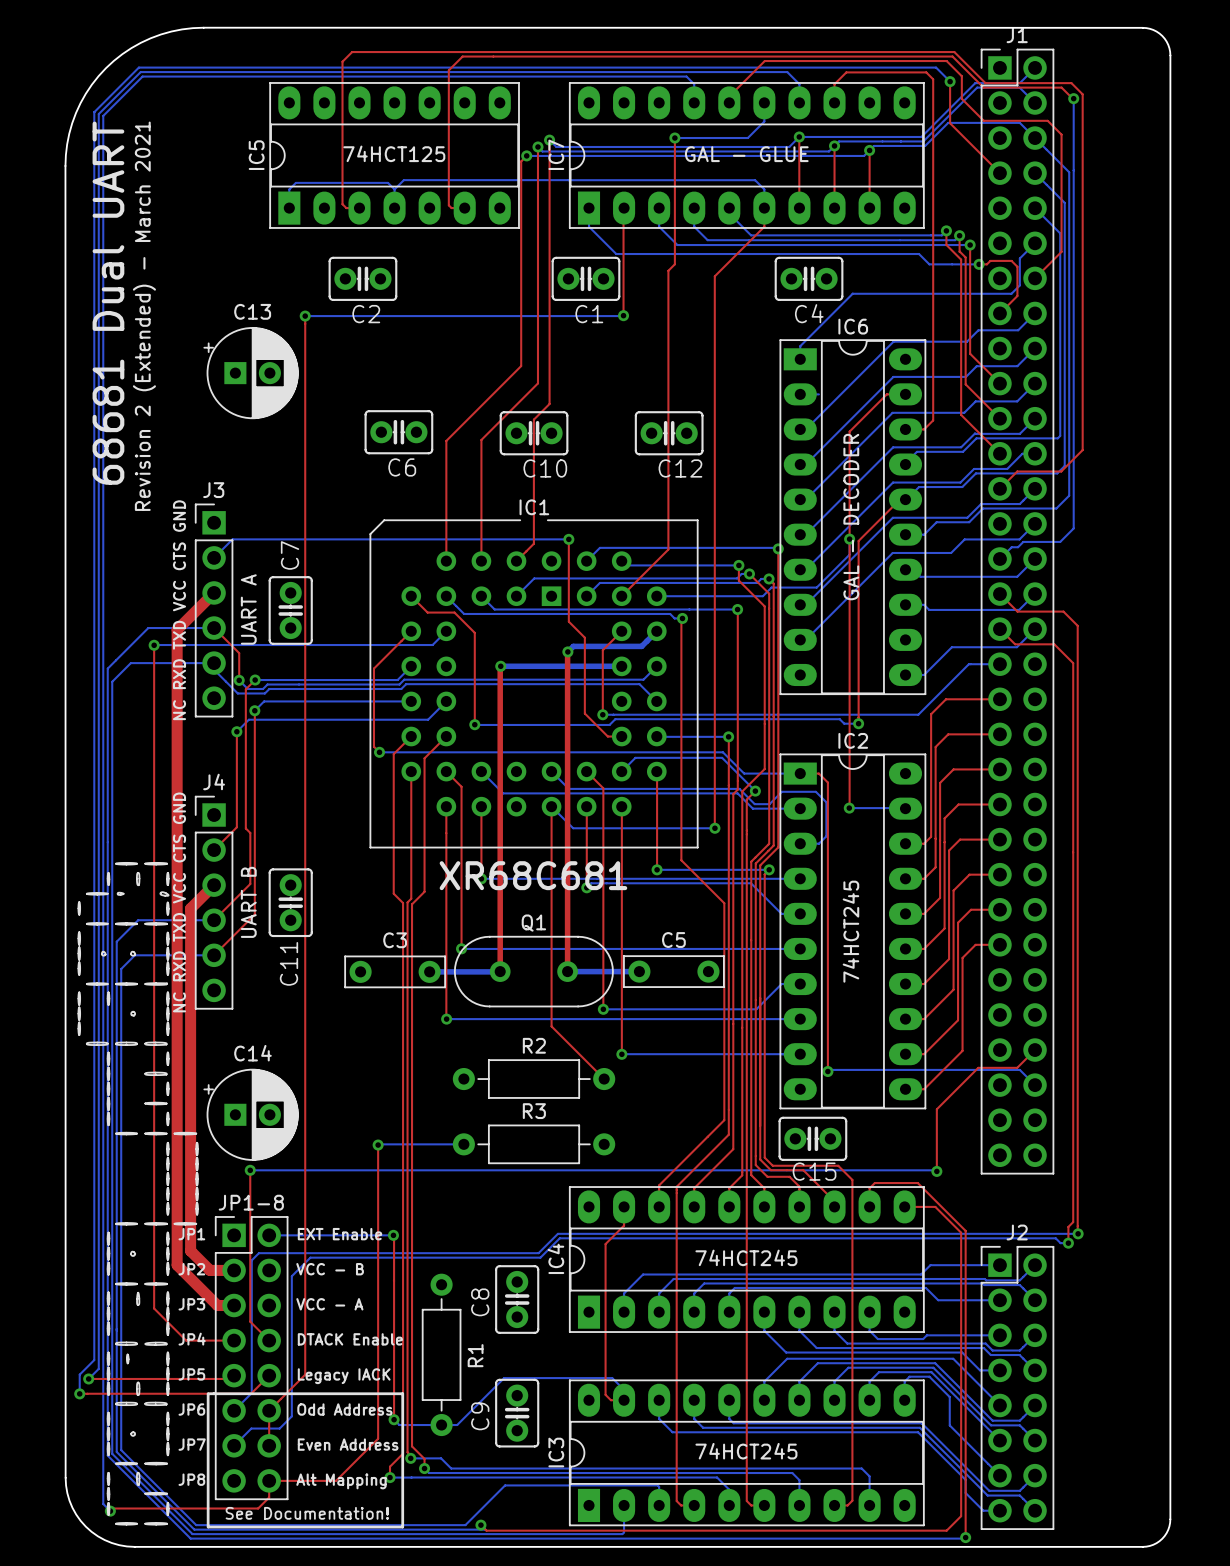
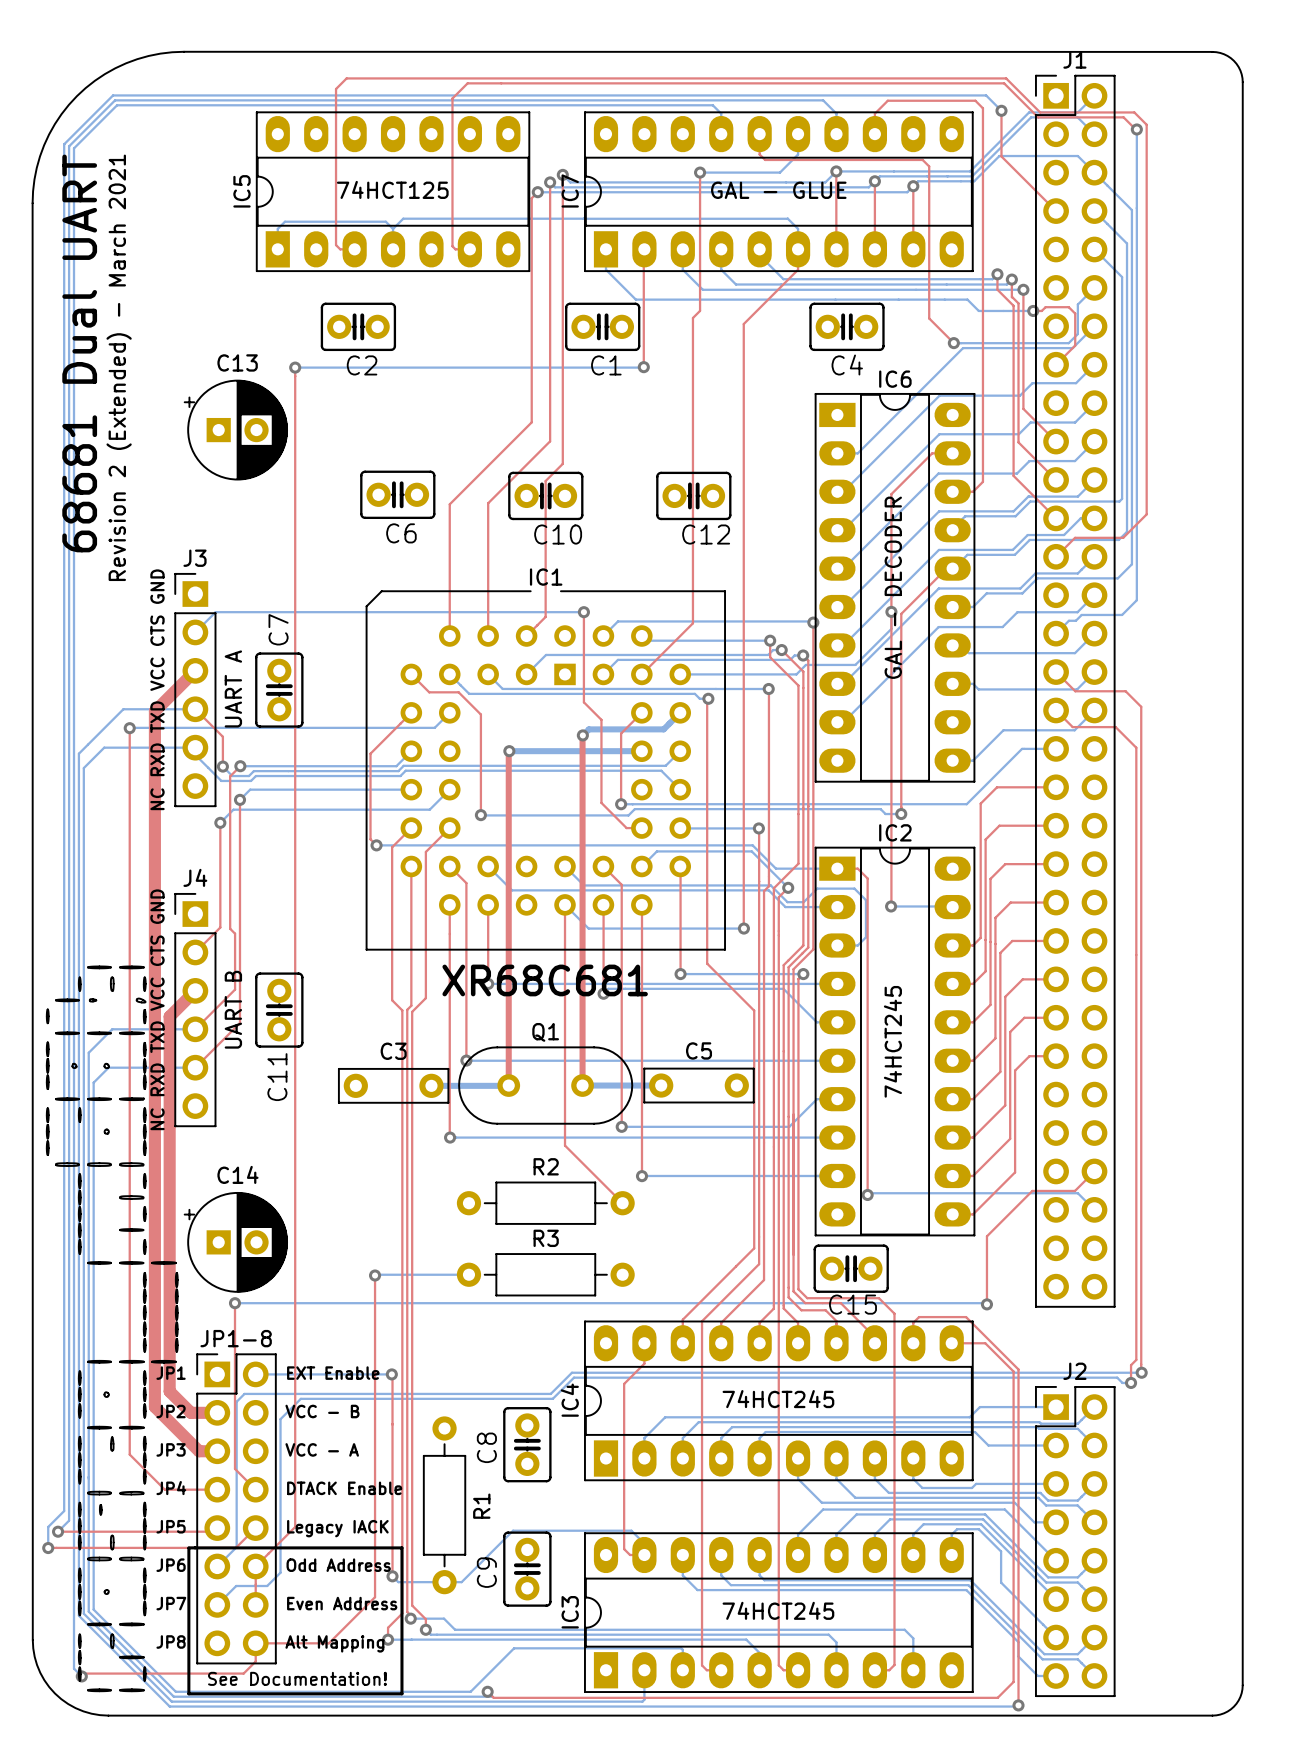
top track: (726, 99) (764, 61) (946, 61) (961, 76) (961, 98) (983, 120) (1047, 120) (1061, 134) (1061, 251) (1035, 278) -> none
top track: none -> (759, 134) (759, 154) (765, 159) (922, 159) (929, 166) (929, 318) (953, 343)
bottom track: none -> (1094, 326) (1072, 348) (963, 348) (857, 453)
bottom track: (906, 293) (852, 293) (800, 346) (800, 359) -> none
via: none -> (953, 343)

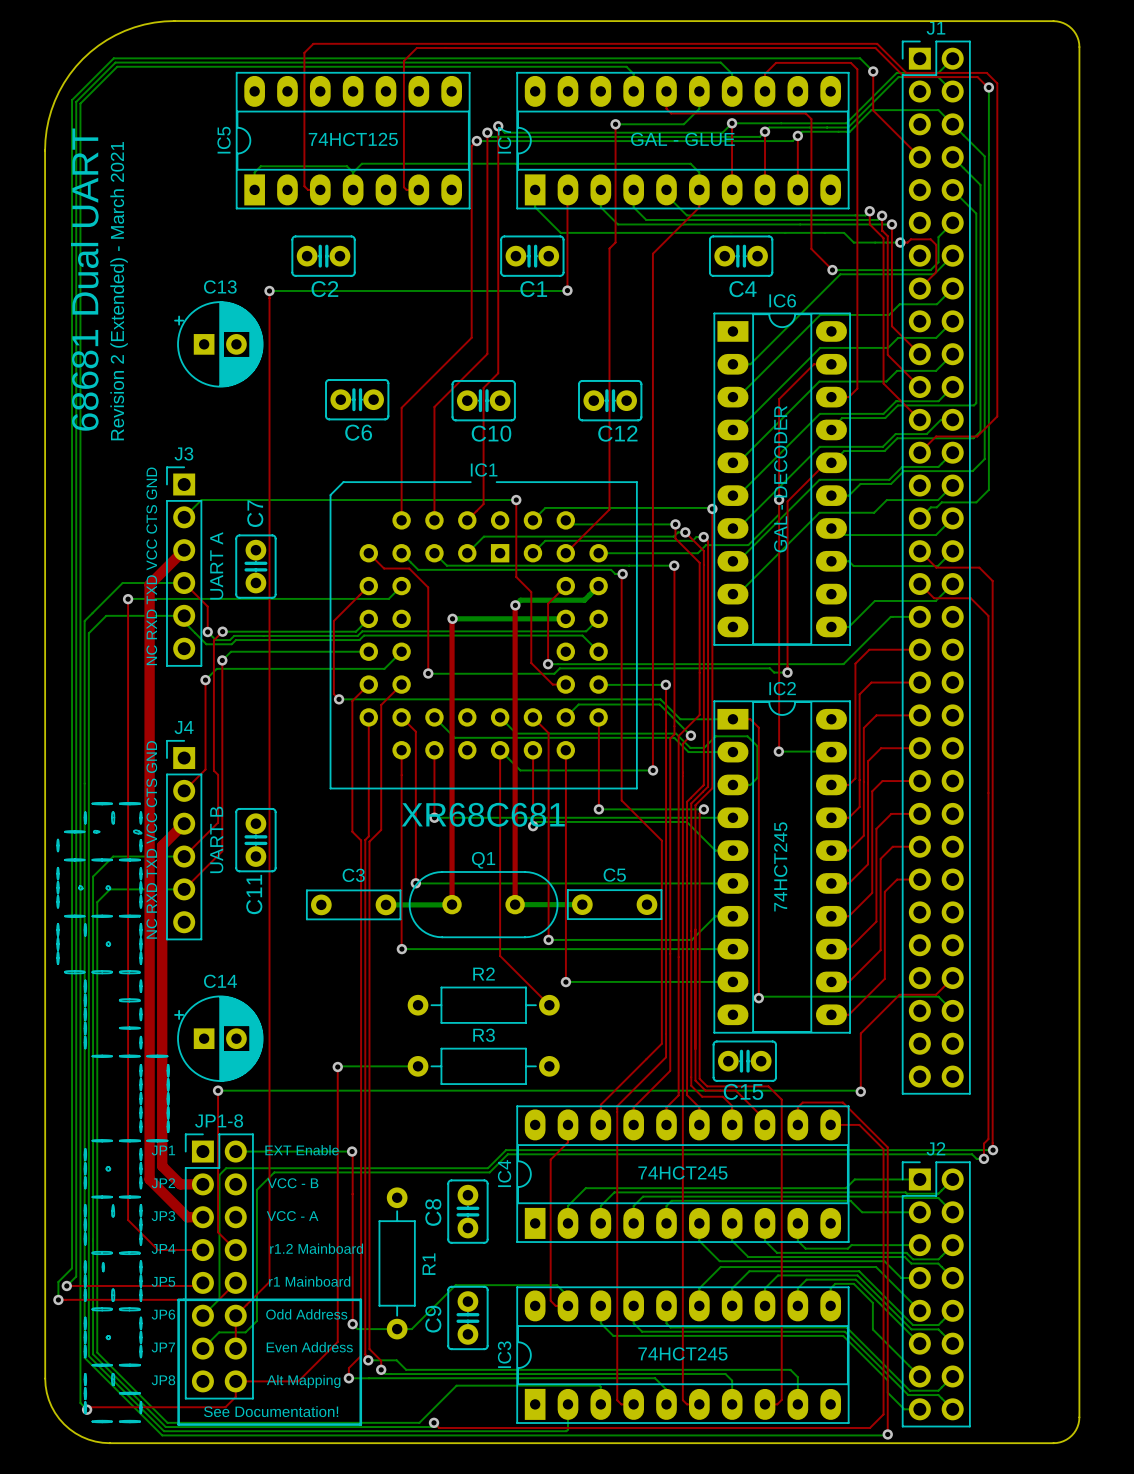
text: DTACK Enable (344, 1488) -> r1.2 Mainboard (316, 1248)
text: Legacy IACK (337, 1528) -> r1 Mainboard (309, 1281)

